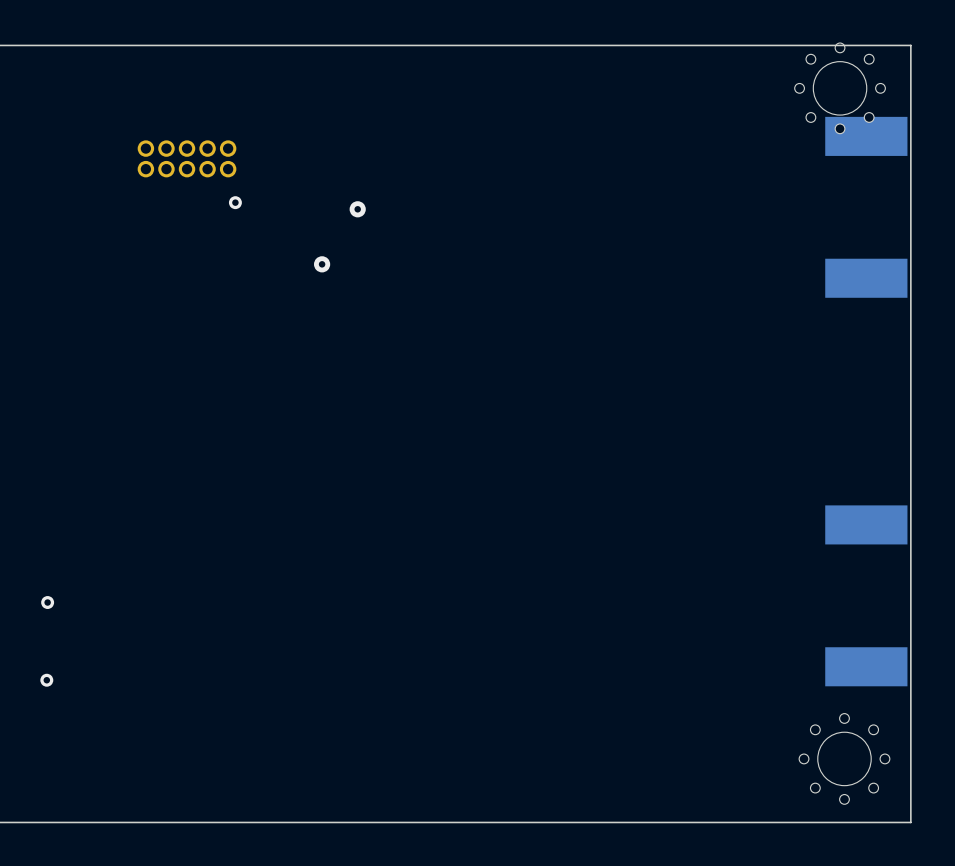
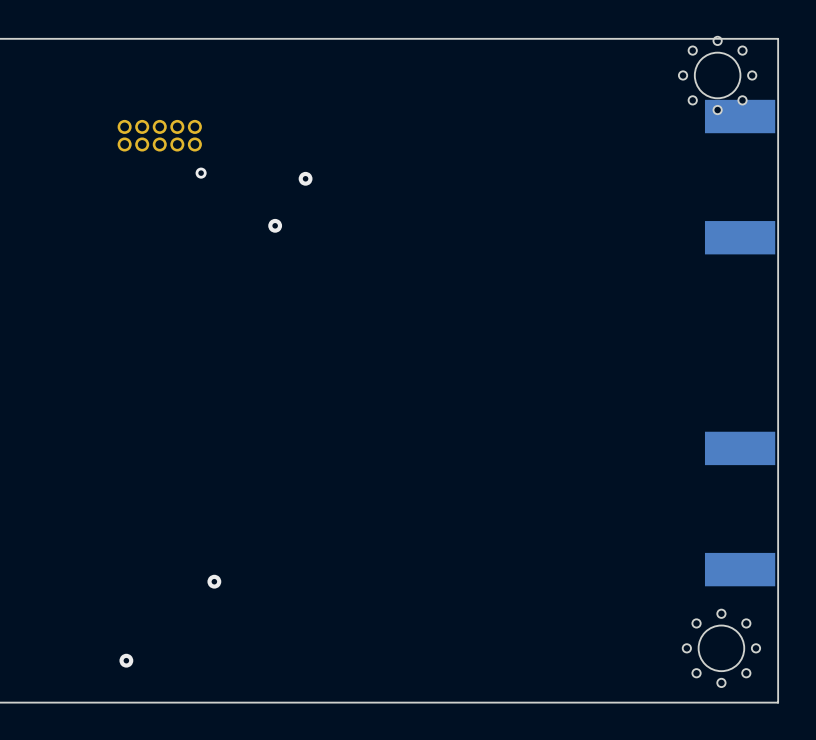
via: (47, 602) -> none
via: (46, 680) -> none
via: none -> (214, 581)
via: none -> (126, 660)

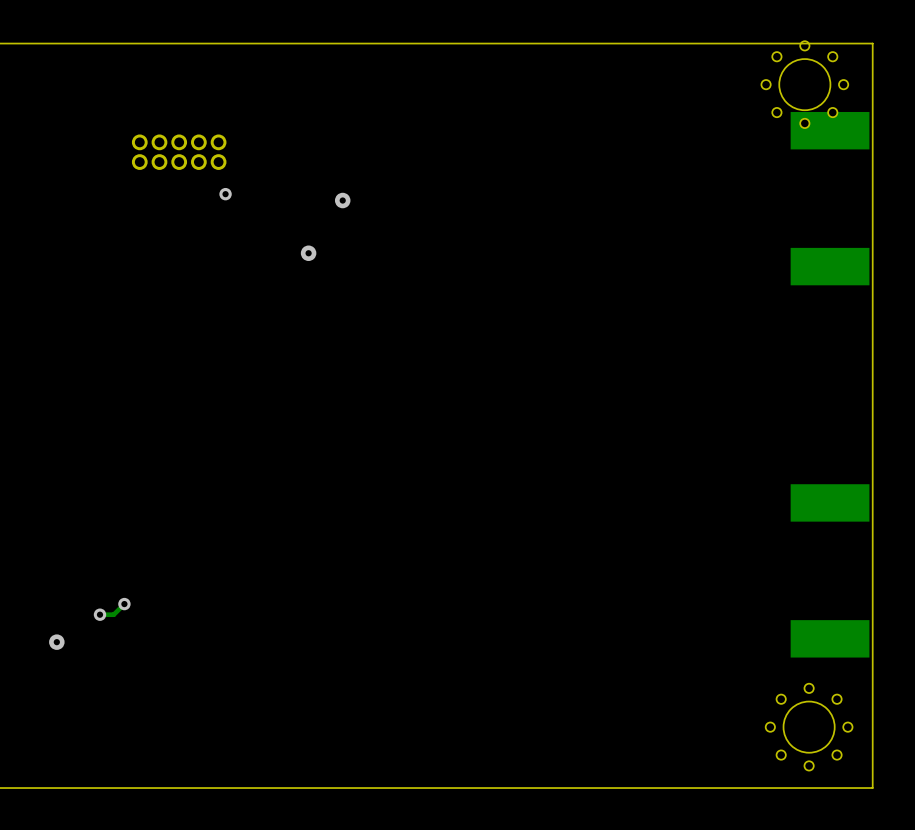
track: none -> (124, 604) (113, 614) (100, 614)
via: none -> (124, 604)
via: none -> (100, 614)
via: none -> (56, 642)
via: (214, 581) -> none
via: (126, 660) -> none

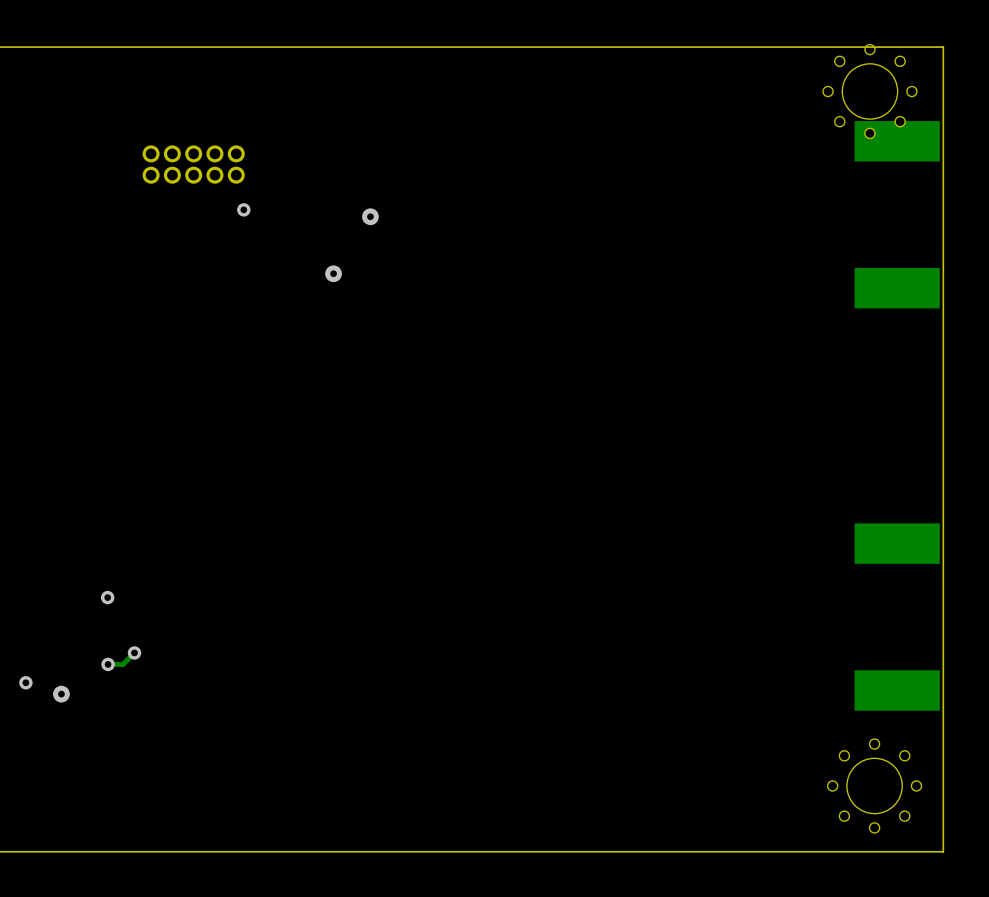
via: none -> (107, 597)
via: none -> (25, 682)

